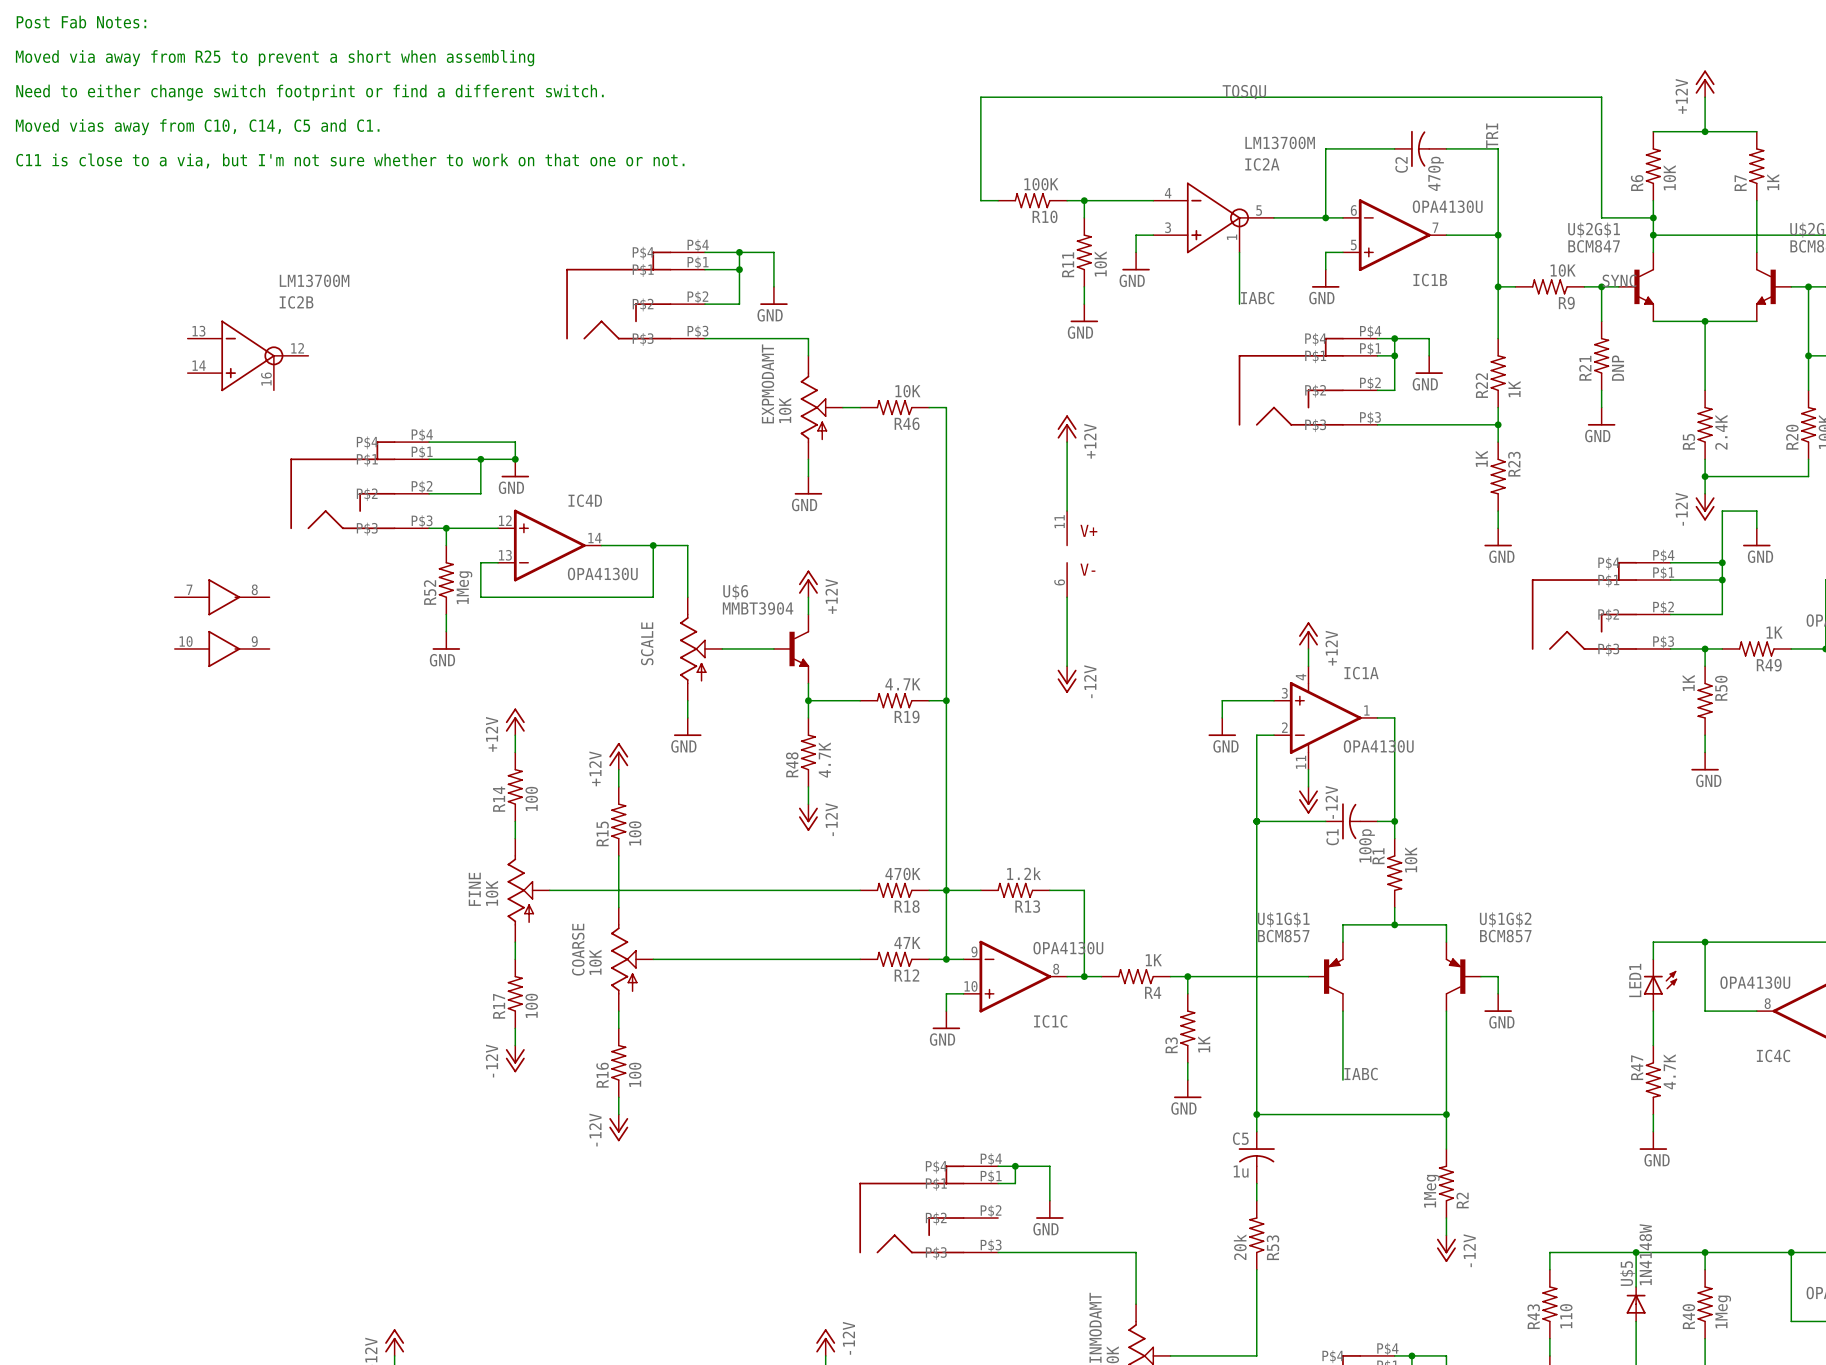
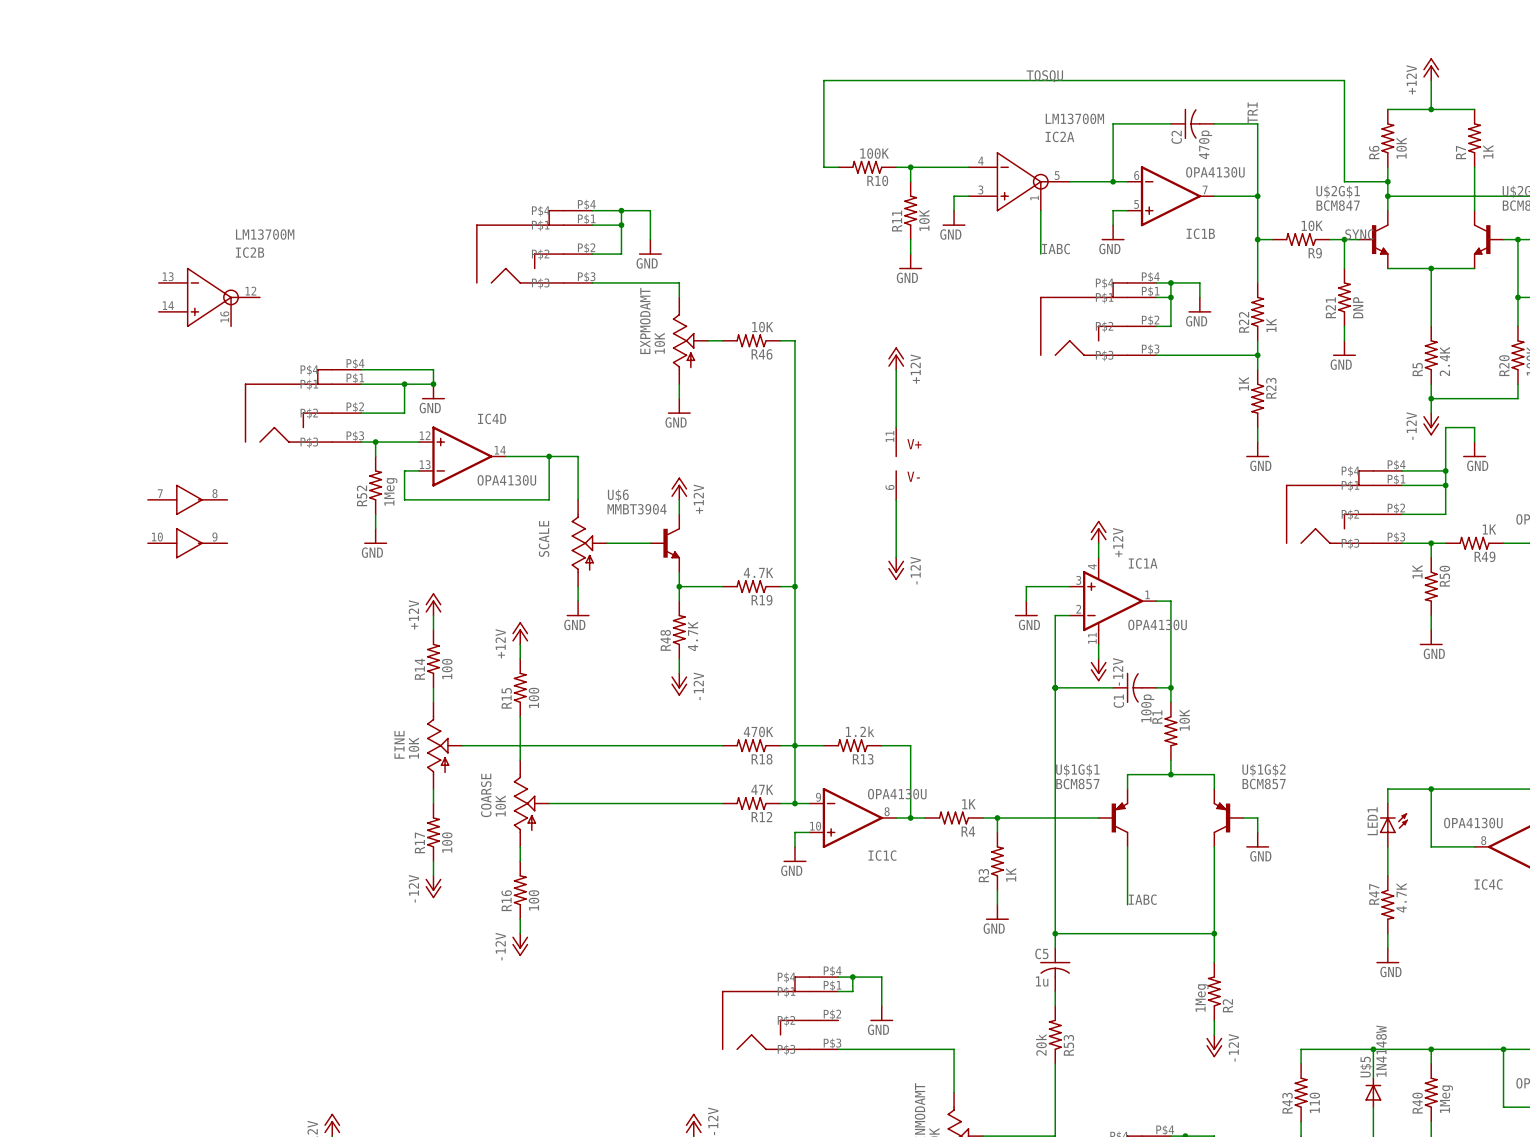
text: Post Fab Notes: (81, 22) -> none
text: Moved via away from R25 to prevent a short when assembling (275, 58) -> none
text: Need to either change switch footprint or find a different switch. (310, 92) -> none
text: Moved vias away from C10, C14, C5 and C1. (197, 127) -> none
text: C11 is close to a via, but I'm not sure whether to work on that one or not. (350, 161) -> none

